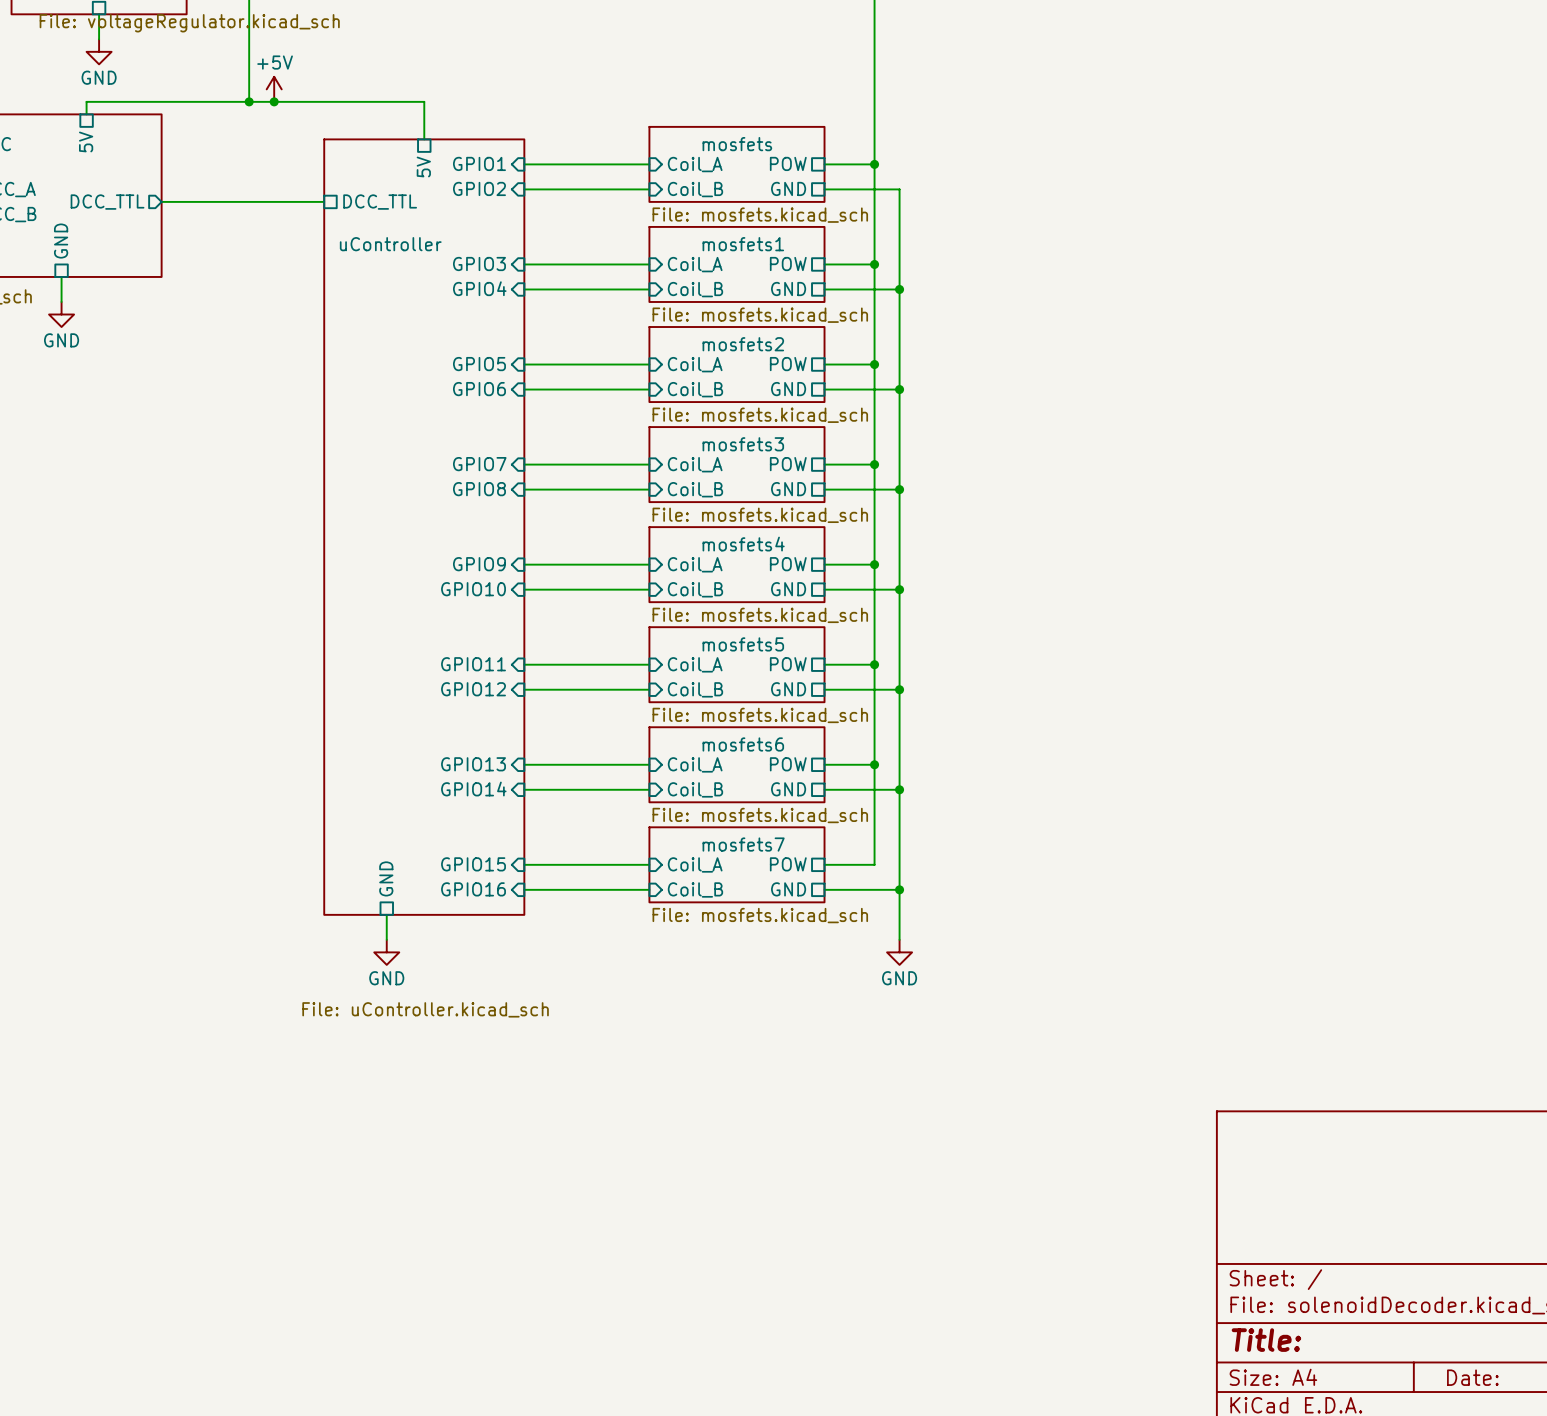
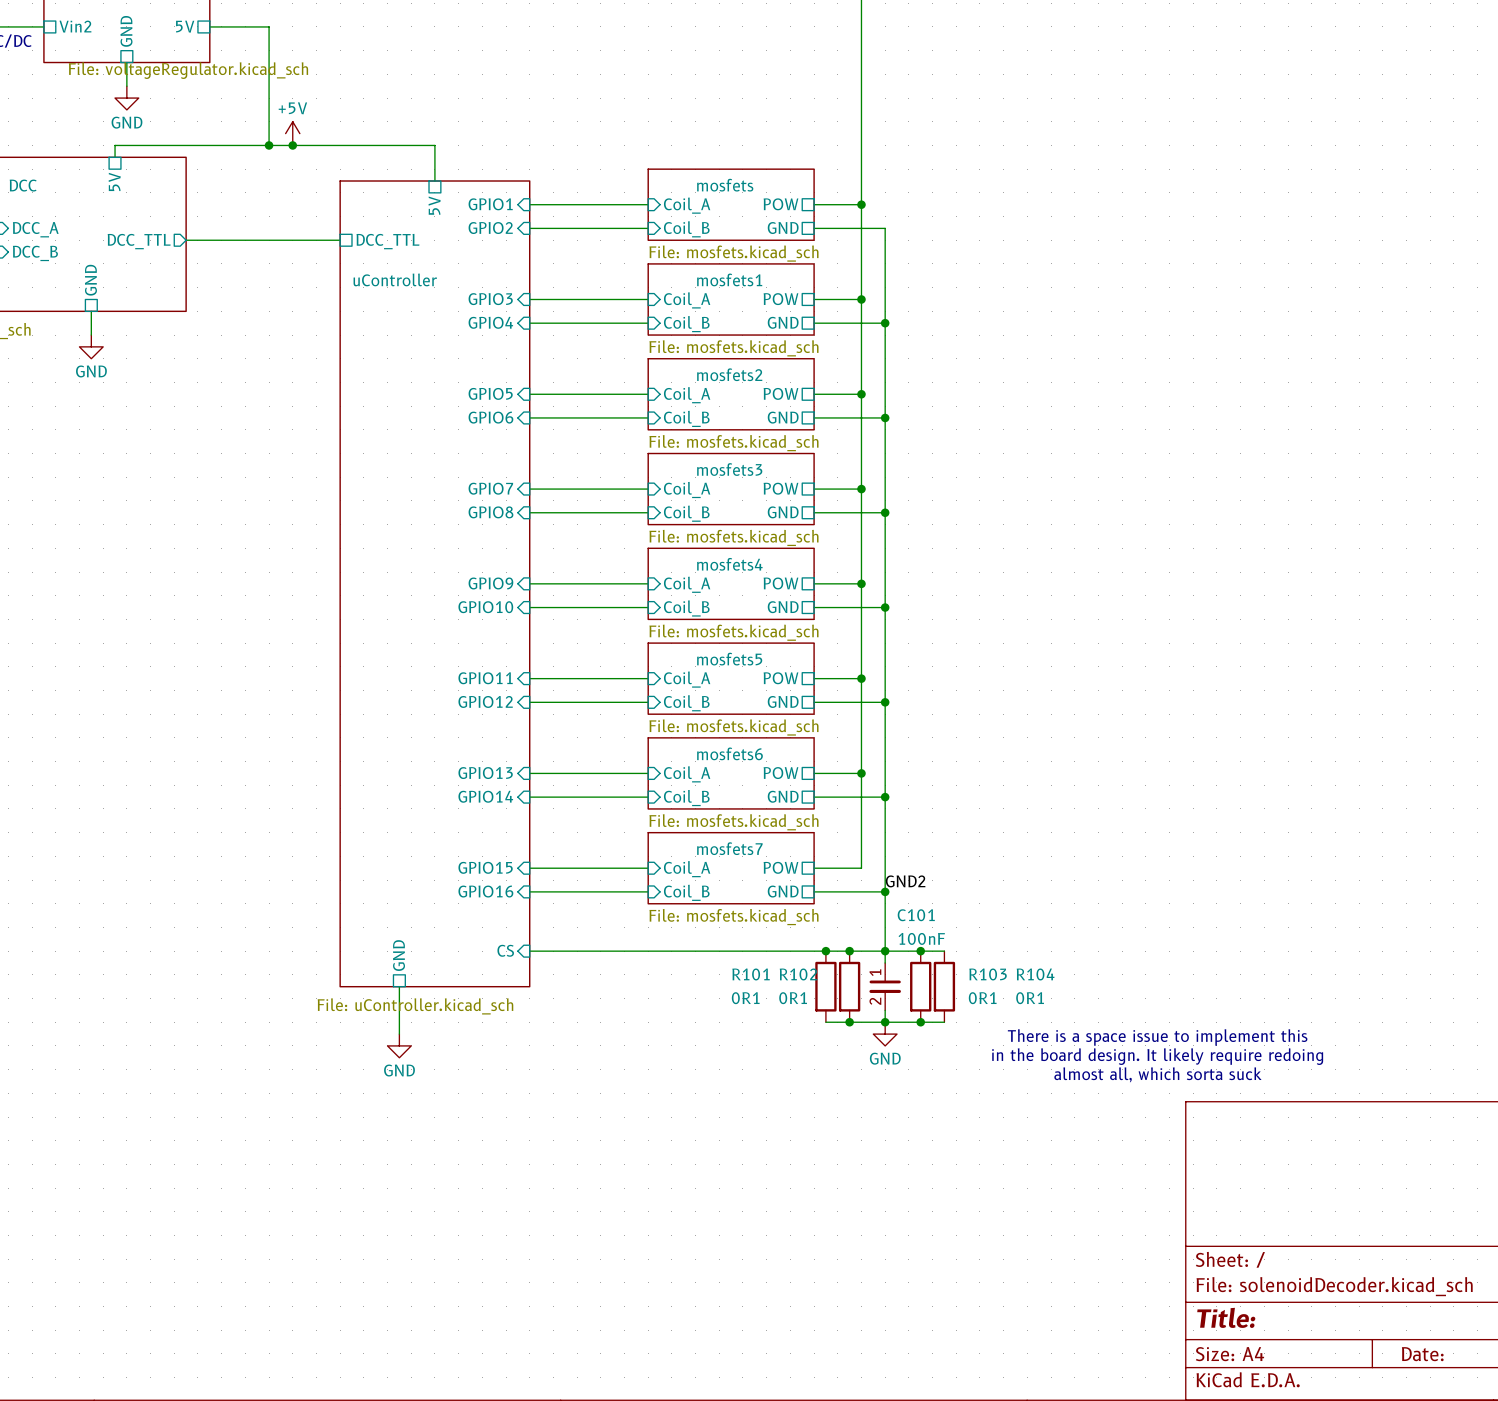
sheet uController: File: uController.kicad_sch (424, 527) -> none
sheet uController: none -> File: uController.kicad_sch (434, 583)
sheet pin position: GND (386, 878) -> GND (399, 955)
label: none -> GND2 (905, 881)
wire: (386, 914) (386, 939) -> none
sheet pin: none -> CS (505, 950)
power symbol position: GND (386, 952) -> GND (399, 1045)
wire: none -> (529, 951) (944, 951)
junction: none -> (825, 951)
junction: none -> (849, 951)
power symbol position: GND (899, 952) -> GND (885, 1034)
junction: none -> (885, 951)
junction: none -> (920, 951)
wire: none -> (399, 986) (399, 1034)
R101: none -> 0R1 (825, 986)
R102: none -> 0R1 (849, 986)
C101: none -> 100nF (885, 986)
R103: none -> 0R1 (920, 986)
R104: none -> 0R1 (944, 986)
wire: none -> (885, 1010) (885, 1022)
wire: none -> (825, 1022) (944, 1022)
junction: none -> (849, 1022)
junction: none -> (885, 1022)
junction: none -> (920, 1022)
text: none -> There is a space issue to implement this (1157, 1037)
text: none -> in the board design. It likely require redoing (1157, 1056)
text: none -> almost all, which sorta suck (1157, 1074)

